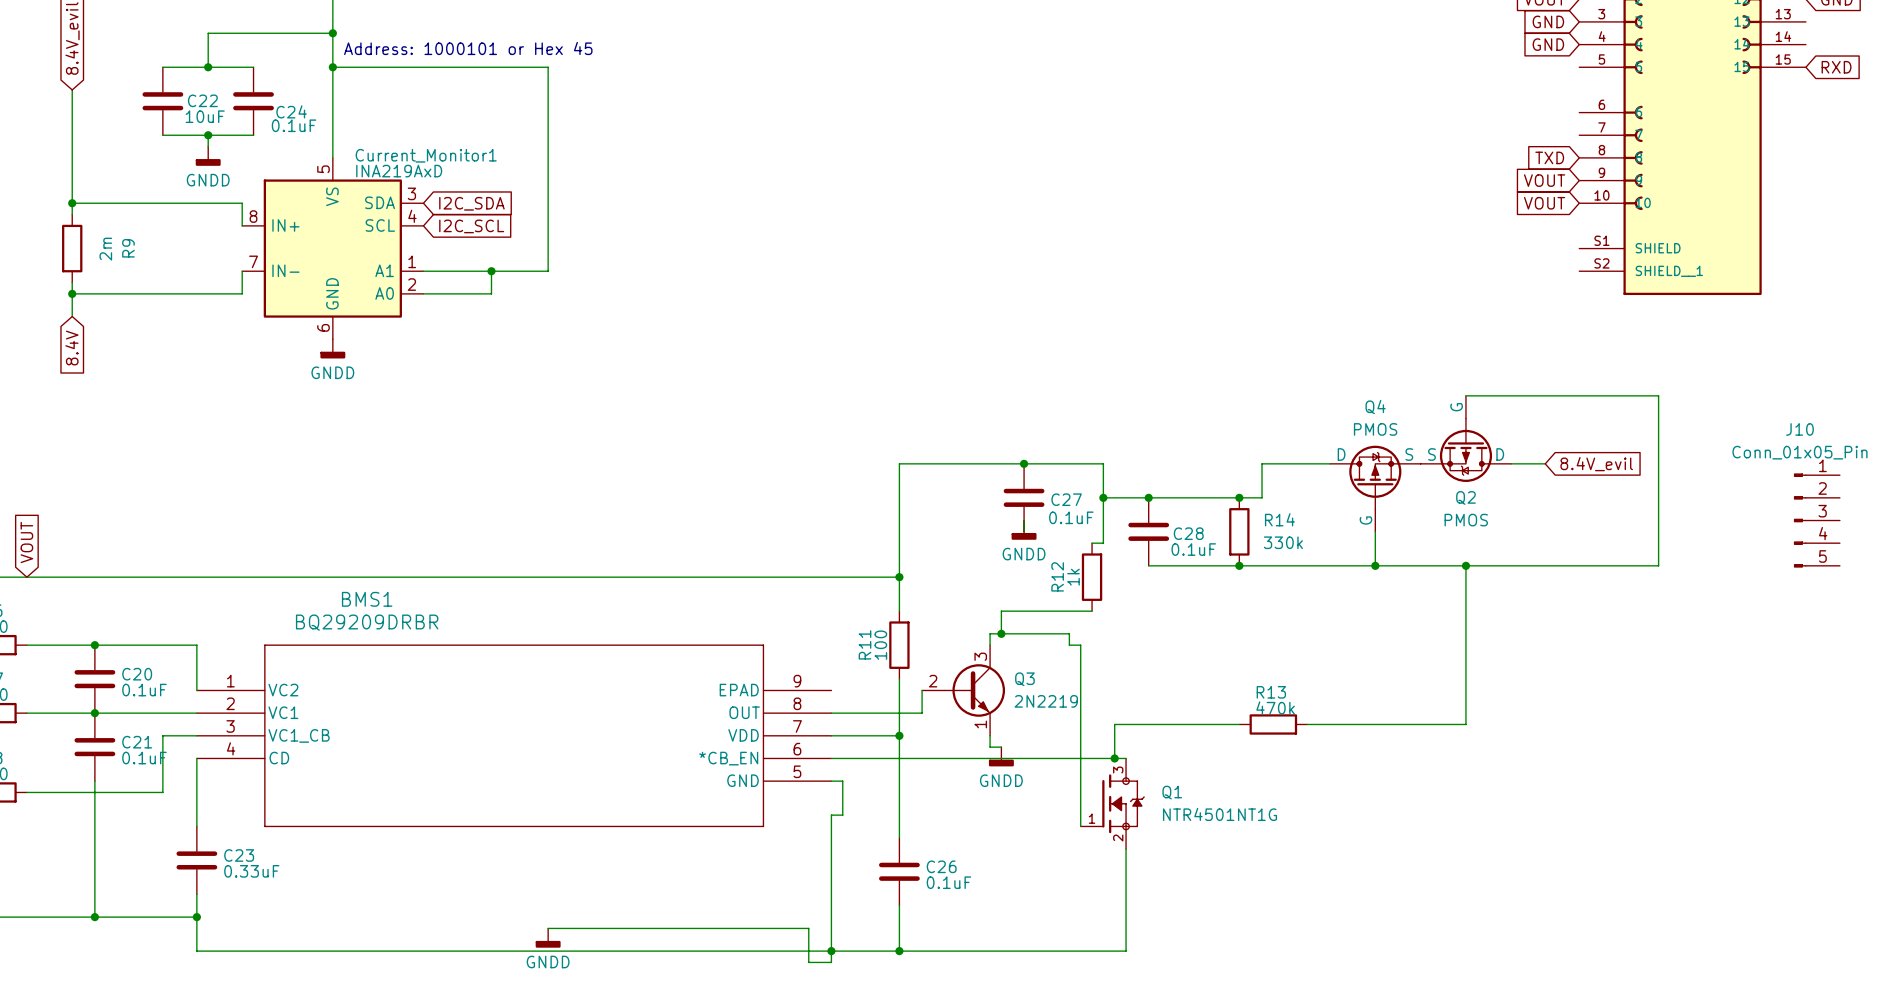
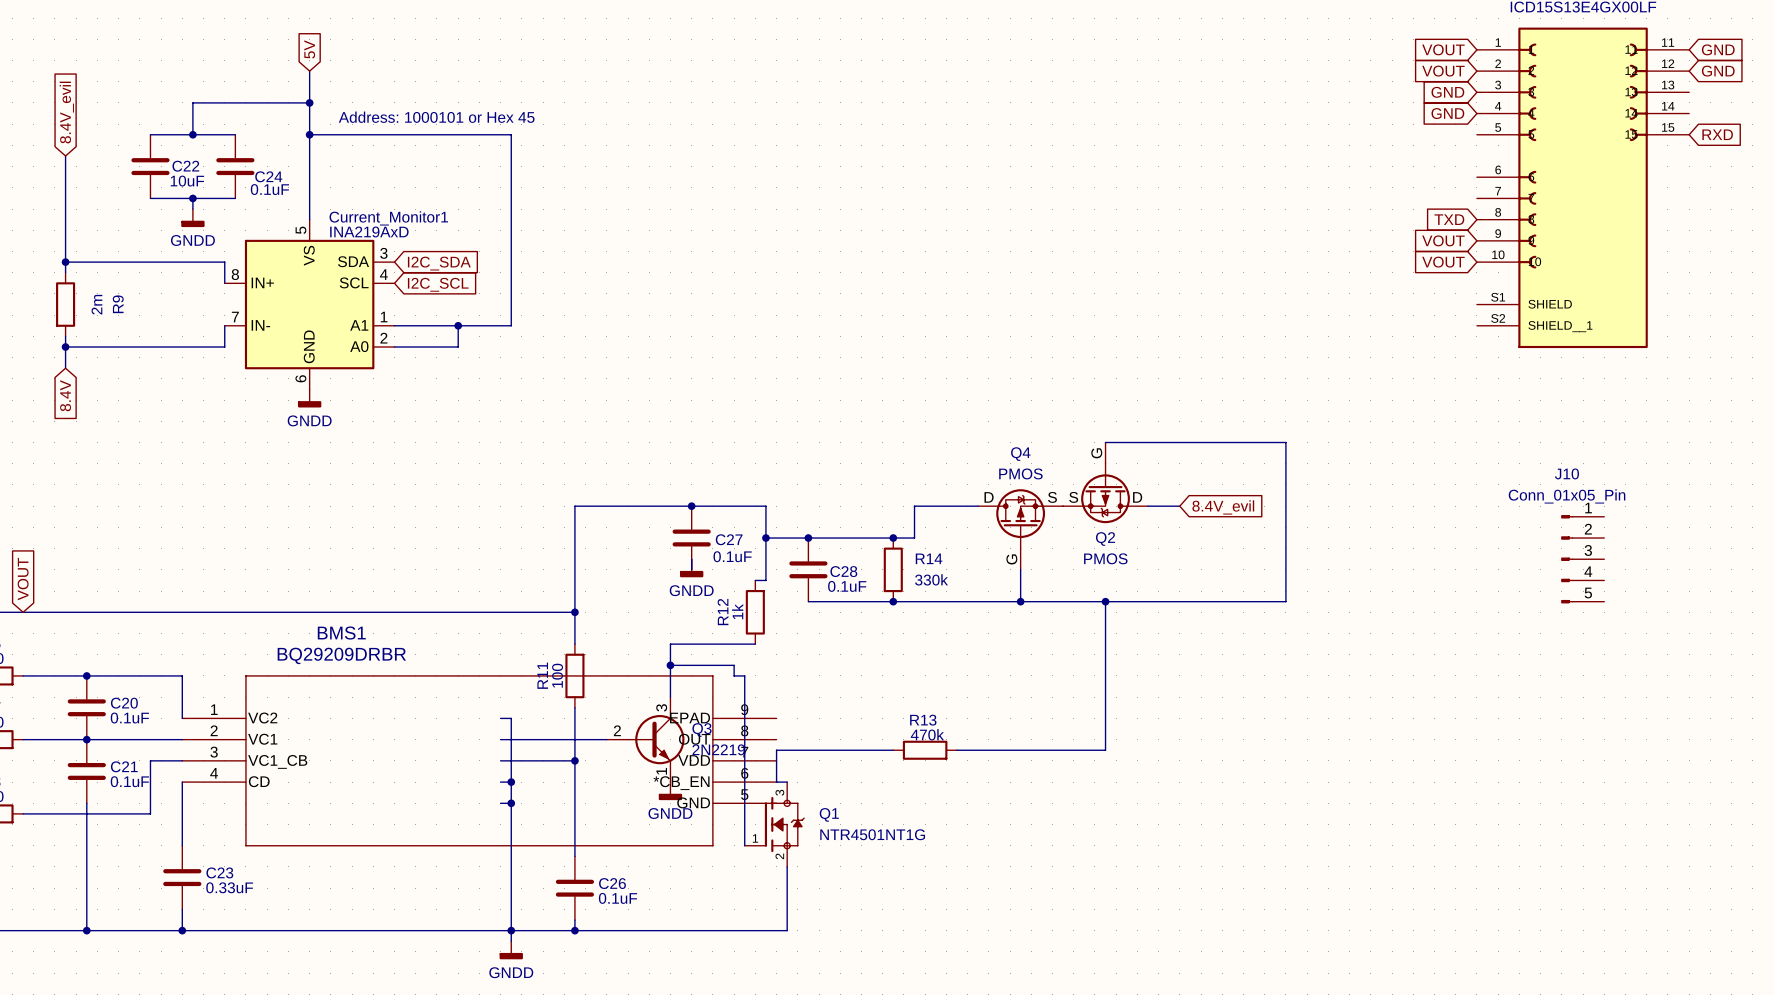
wire: none -> (1105, 442) (1285, 442) (1285, 569)
wire: (1465, 395) (1658, 395) (1658, 565) (1375, 565) -> none
Q2 position: (1465, 438) -> (1105, 482)
junction: none -> (691, 506)
wire: (978, 463) (899, 463) (899, 611) -> (914, 506) (914, 538) (765, 538)
junction: (1024, 463) -> none
wire: (1046, 463) (1103, 463) (1103, 543) (1092, 543) -> none
wire: none -> (1147, 506) (1179, 506)
wire: (1329, 463) (1262, 463) (1262, 497) (1103, 497) -> none
wire: (1511, 463) (1545, 463) -> none
global label: none -> 8.4V_evil (1223, 507)
global label: 8.4V_evil (1596, 464) -> none
Q4 position: (1375, 488) -> (1020, 529)
junction: none -> (765, 538)
junction: none -> (808, 538)
junction: none -> (893, 538)
C27 position: (1024, 497) -> (691, 538)
junction: (1103, 497) -> none
junction: (1148, 497) -> none
junction: (1239, 497) -> none
wire: none -> (691, 559) (691, 569)
wire: (1024, 520) (1024, 531) -> none
J10 position: (1816, 520) -> (1582, 559)
power symbol: none -> GNDD (691, 568)
power symbol: GNDD (1024, 530) -> none
wire: none -> (1020, 569) (1020, 601)
C28 position: (1148, 531) -> (808, 569)
R14 position: (1239, 531) -> (893, 569)
wire: none -> (755, 580) (765, 580) (765, 506) (574, 506) (574, 644)
junction: none -> (893, 601)
junction: none -> (1020, 601)
junction: none -> (1105, 601)
junction: (1239, 565) -> none
junction: (1375, 565) -> none
wire: (1465, 565) (1465, 724) (1307, 724) -> none
junction: (1465, 565) -> none
wire: (616, 577) (899, 577) -> none
junction: none -> (574, 612)
junction: (899, 577) -> none
R12 position: (1092, 577) -> (755, 612)
wire: none -> (755, 644) (670, 644) (670, 697)
wire: (1092, 611) (1001, 611) (1001, 633) -> none
wire: none -> (670, 665) (734, 665) (734, 675) (744, 675) (744, 845)
junction: none -> (670, 665)
junction: (1001, 633) -> none
R11 position: (899, 645) -> (574, 675)
wire: (990, 645) (990, 633) (1069, 633) (1069, 645) (1080, 645) (1080, 826) -> none
wire: none -> (574, 707) (574, 856)
wire: (899, 679) (899, 837) -> none
wire: (922, 690) (922, 713) (831, 713) -> none
Q3 position: (963, 690) -> (645, 739)
wire: none -> (500, 739) (606, 739)
wire: none -> (893, 750) (776, 750) (776, 782)
wire: (1114, 724) (1114, 758) -> (1041, 750) (956, 750)
wire: (1182, 724) (1239, 724) -> (1105, 750) (1105, 601)
R13 position: (1273, 724) -> (925, 750)
wire: none -> (500, 760) (574, 760)
junction: none -> (574, 760)
wire: (831, 735) (899, 735) -> none
junction: (899, 735) -> none
wire: (990, 735) (990, 747) (1001, 747) -> none
power symbol: GNDD (1001, 756) -> none
wire: none -> (500, 782) (511, 782)
junction: none -> (511, 782)
wire: (842, 758) (1126, 758) -> (808, 601) (1073, 601)
junction: (1114, 758) -> none
power symbol: none -> GNDD (670, 791)
wire: none -> (500, 803) (511, 803)
junction: none -> (511, 803)
wire: (831, 781) (842, 781) (842, 815) (831, 815) (831, 962) (808, 962) (808, 928) (548, 928) -> (500, 718) (511, 718) (511, 941)
Q1 position: (1112, 803) -> (774, 824)
wire: (1126, 849) (1126, 951) (196, 951) (196, 917) -> (787, 866) (787, 930) (182, 930)
C26 position: (899, 871) -> (574, 888)
wire: none -> (574, 920) (574, 930)
wire: (899, 905) (899, 951) -> none
junction: none -> (511, 930)
junction: none -> (574, 930)
junction: (831, 951) -> none
junction: (899, 951) -> none

